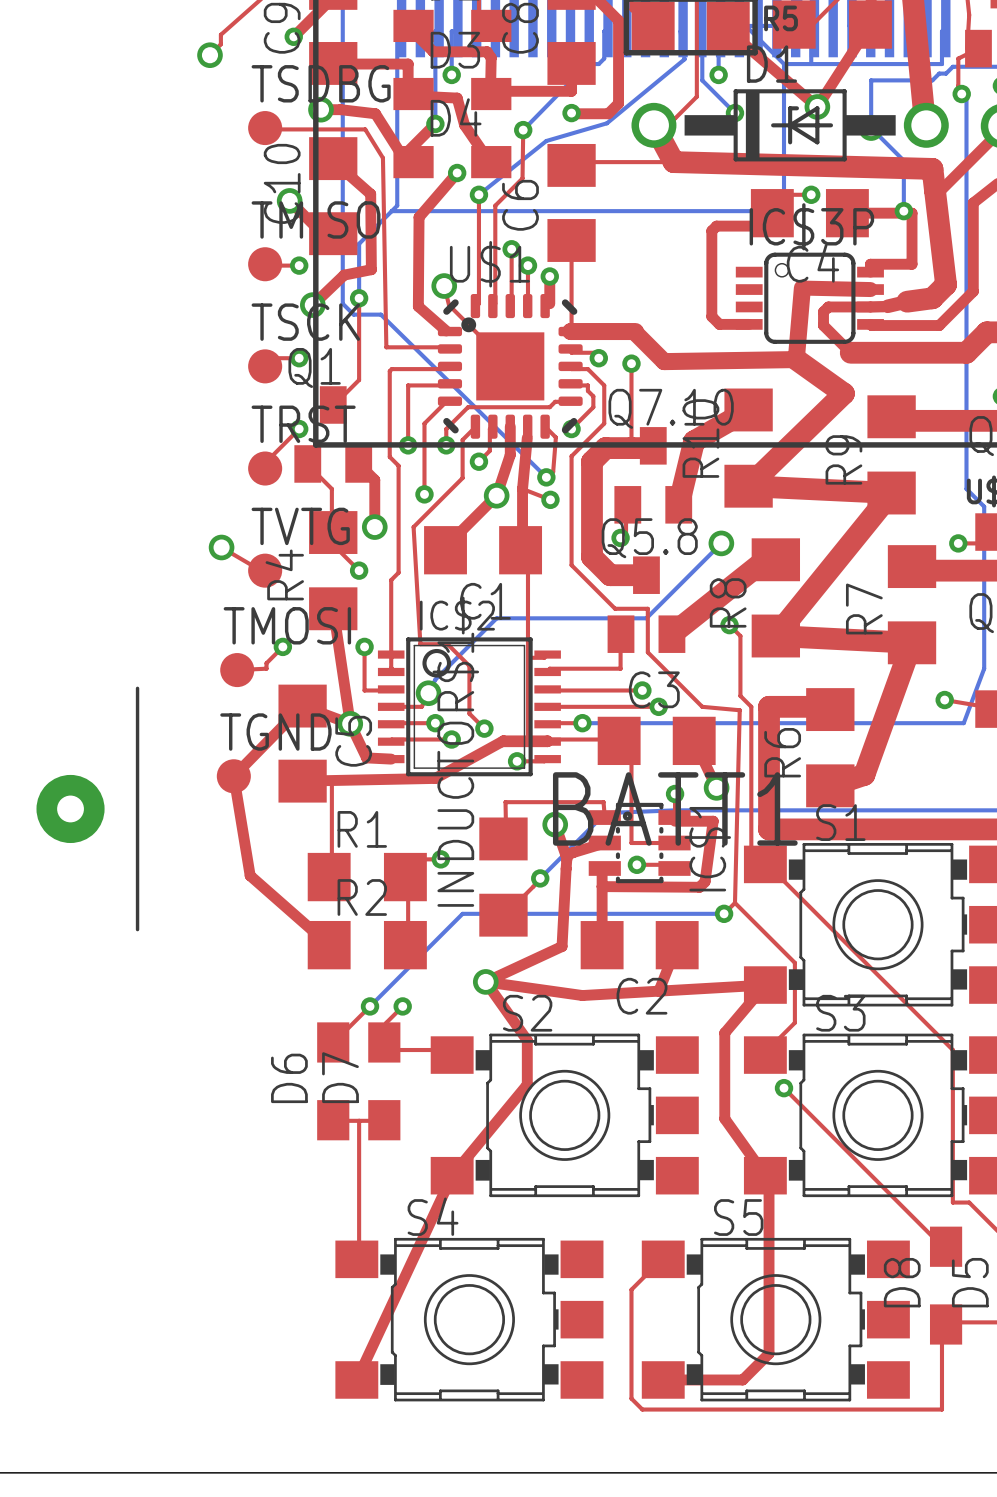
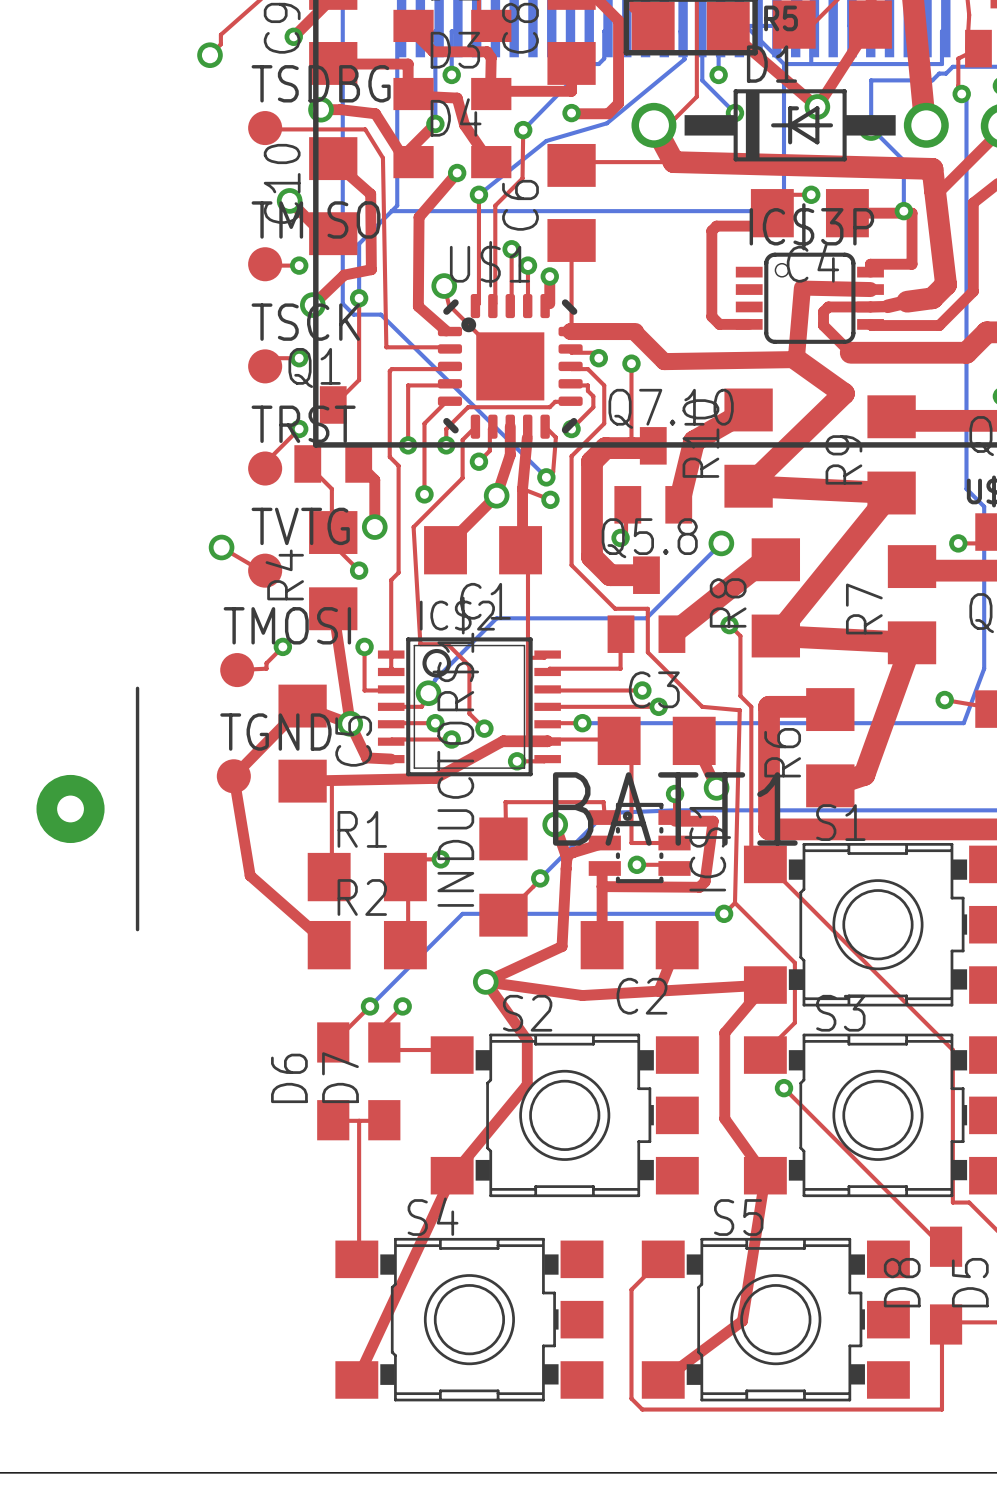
top track: (765, 1175) (769, 1179) (769, 1353) (742, 1379) (663, 1379) -> (765, 1175) (742, 1321) (663, 1379)

